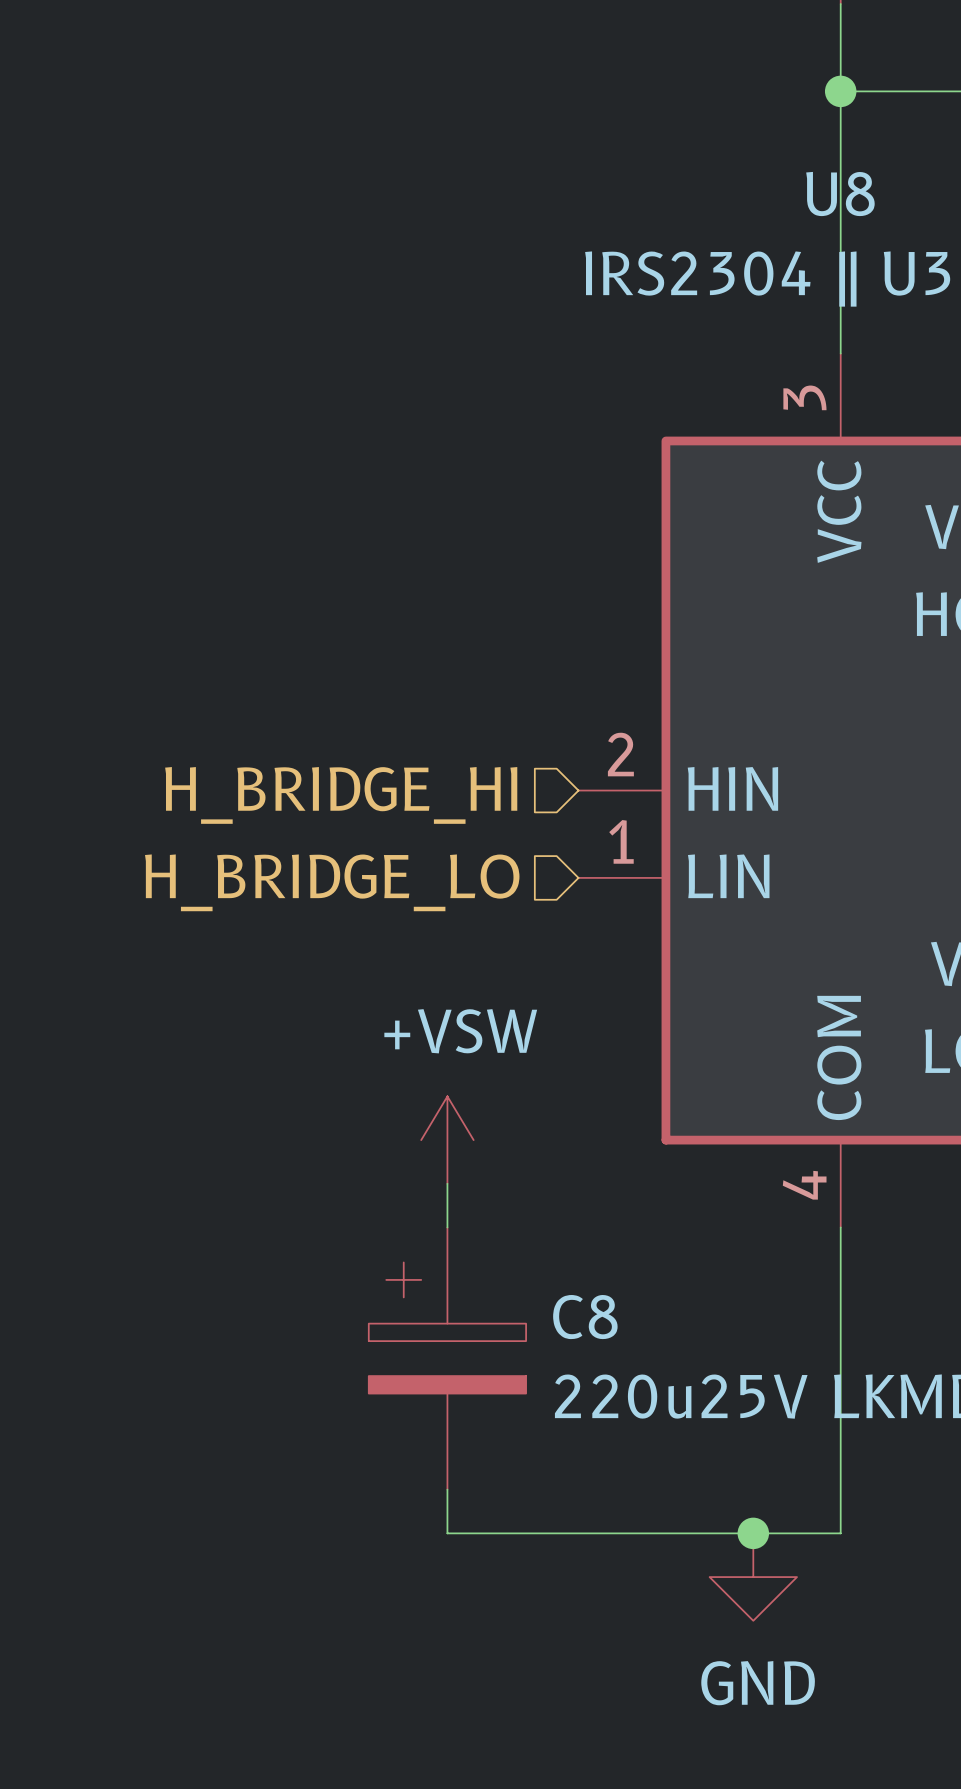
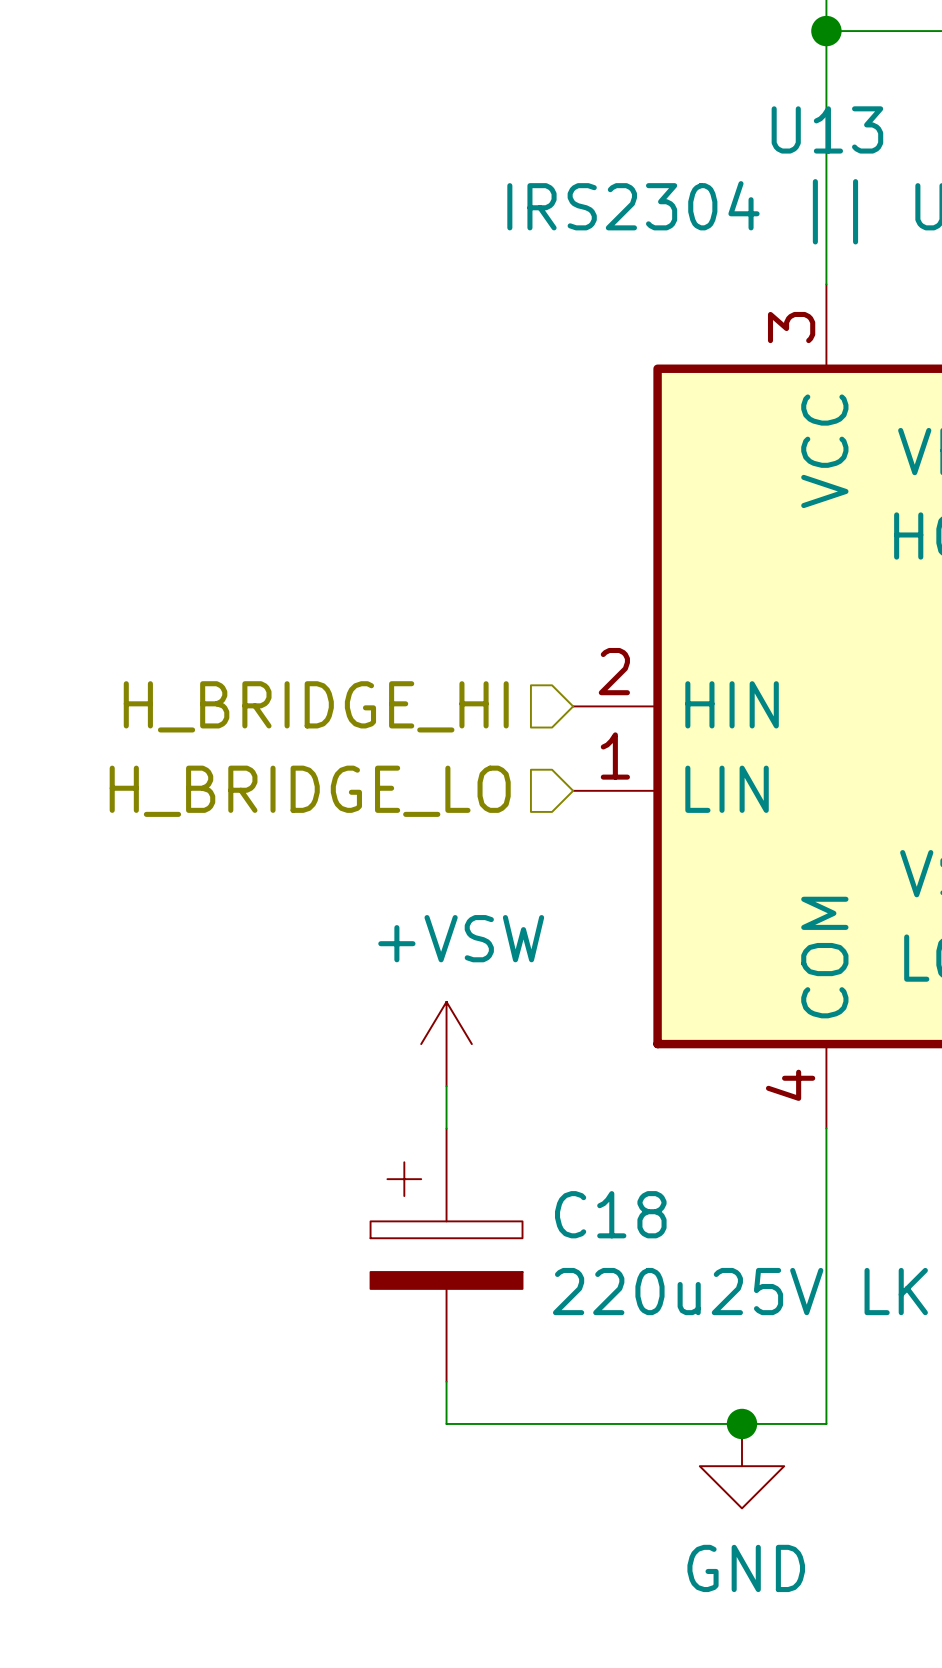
U8 name: U8 (840, 194) -> U13 (827, 129)
C8 name: C8 (585, 1317) -> C18 (610, 1214)

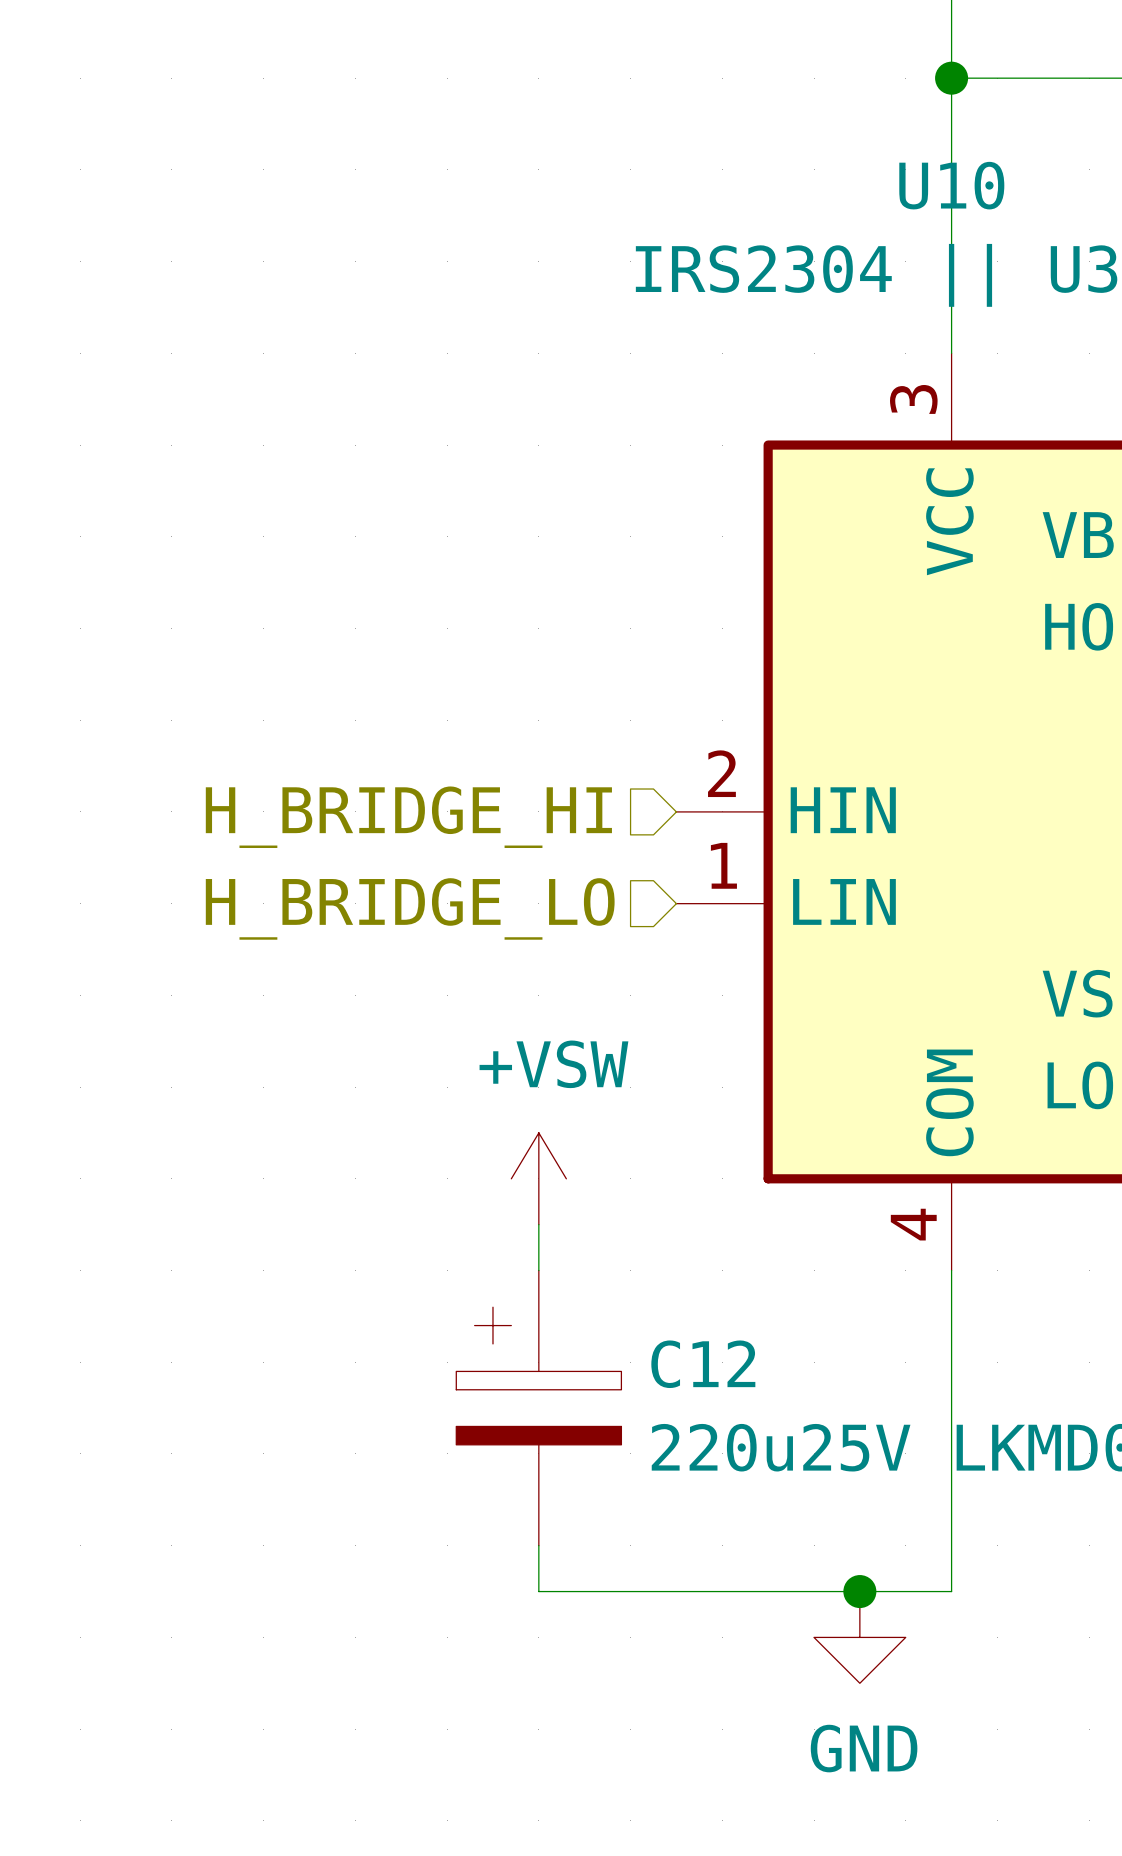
U13 name: U13 (827, 129) -> U10 (951, 185)
C18 name: C18 (610, 1214) -> C12 (703, 1364)

